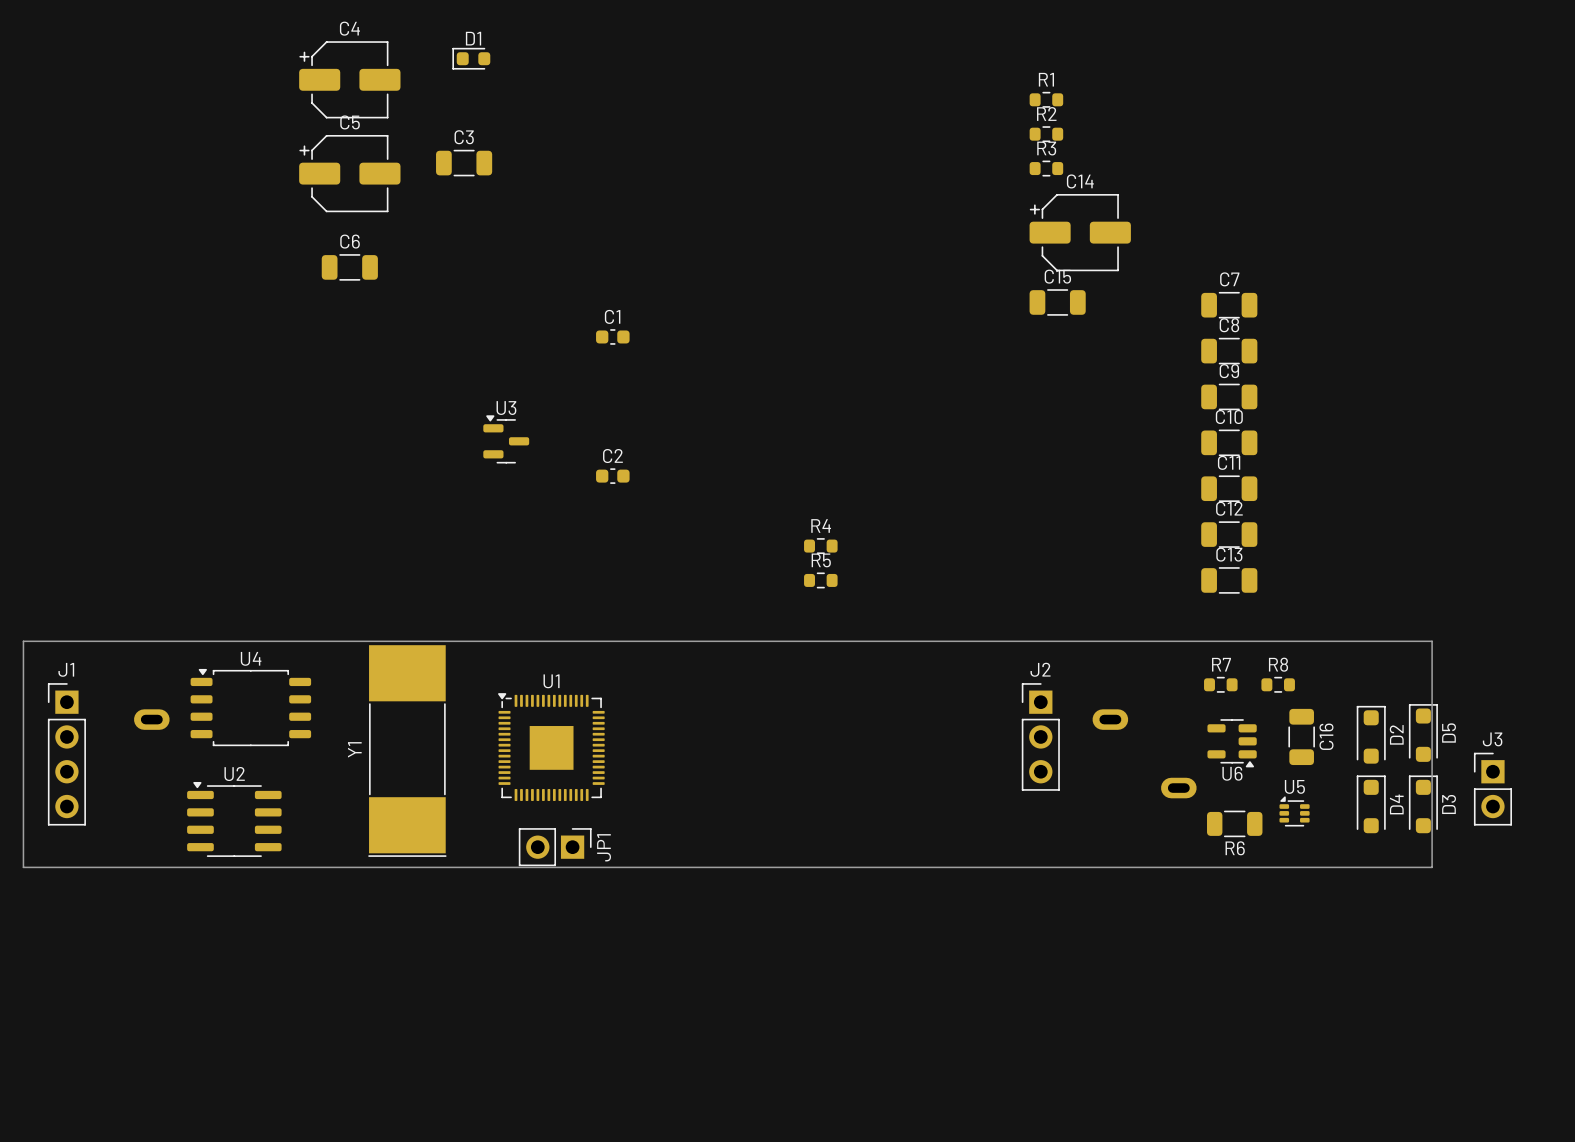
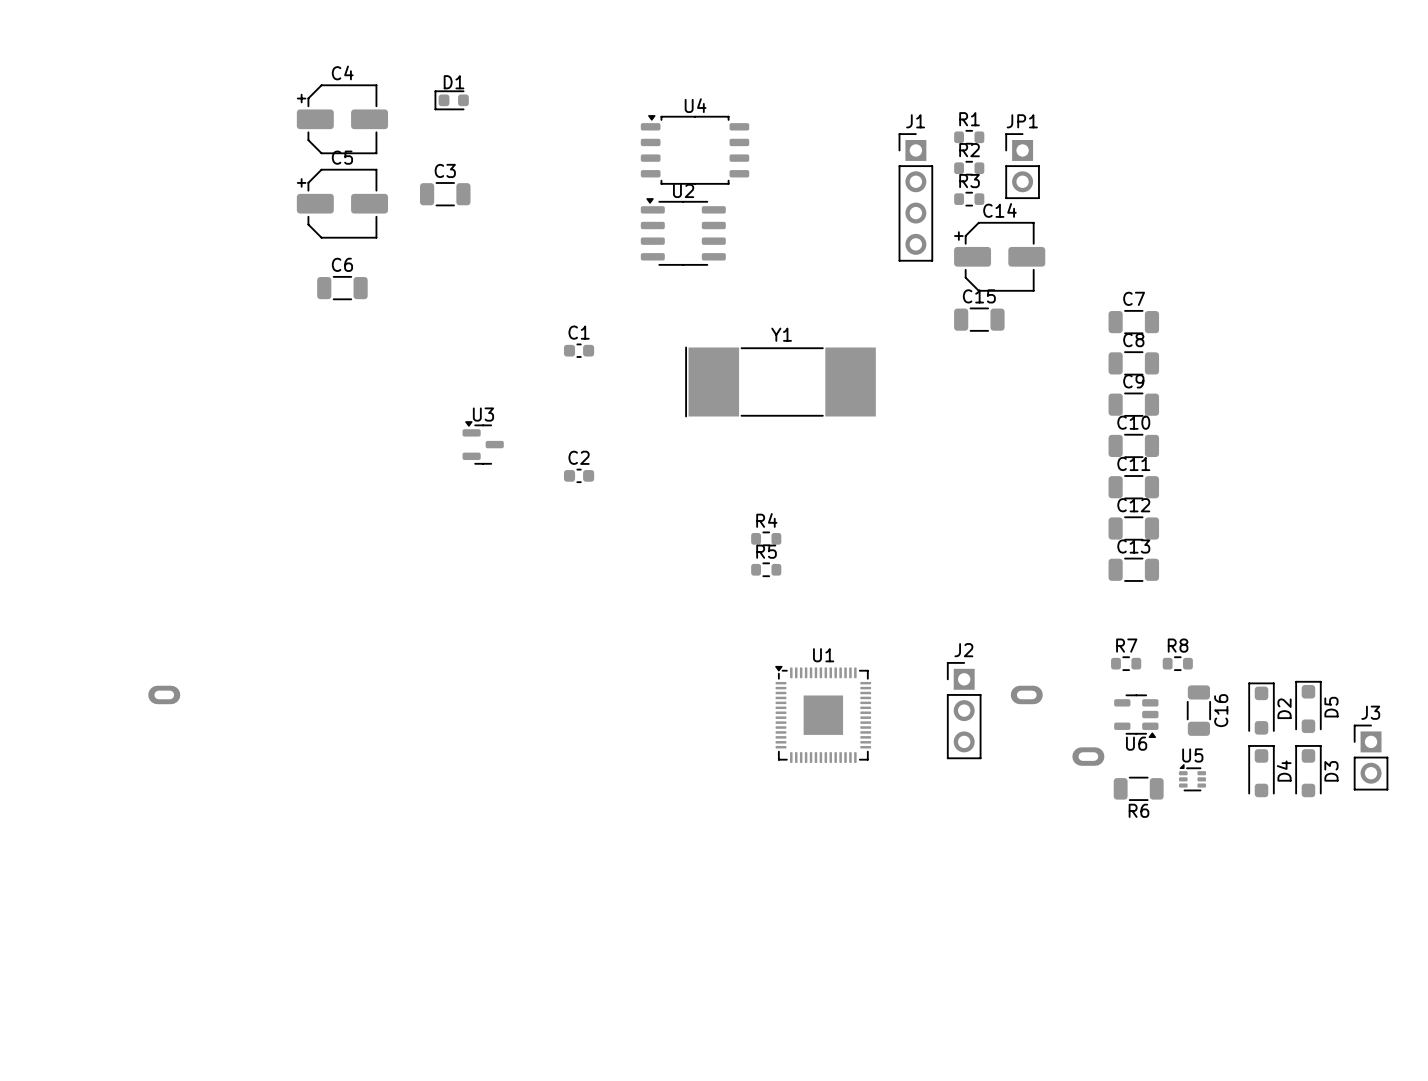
board edge: (23, 641) (1432, 641) (1432, 867) (23, 867) (23, 641) -> none
U4 position: (250, 707) -> (695, 149)
U1 position: (551, 747) -> (823, 714)
Y1 rotation: 0° (407, 751) -> 90° clockwise (780, 381)
Y1 position: (407, 751) -> (780, 381)
J1 position: (66, 754) -> (915, 197)
U2 position: (234, 819) -> (683, 231)
JP1 rotation: 0° (555, 847) -> 90° counterclockwise (1022, 166)
JP1 position: (555, 847) -> (1022, 166)

